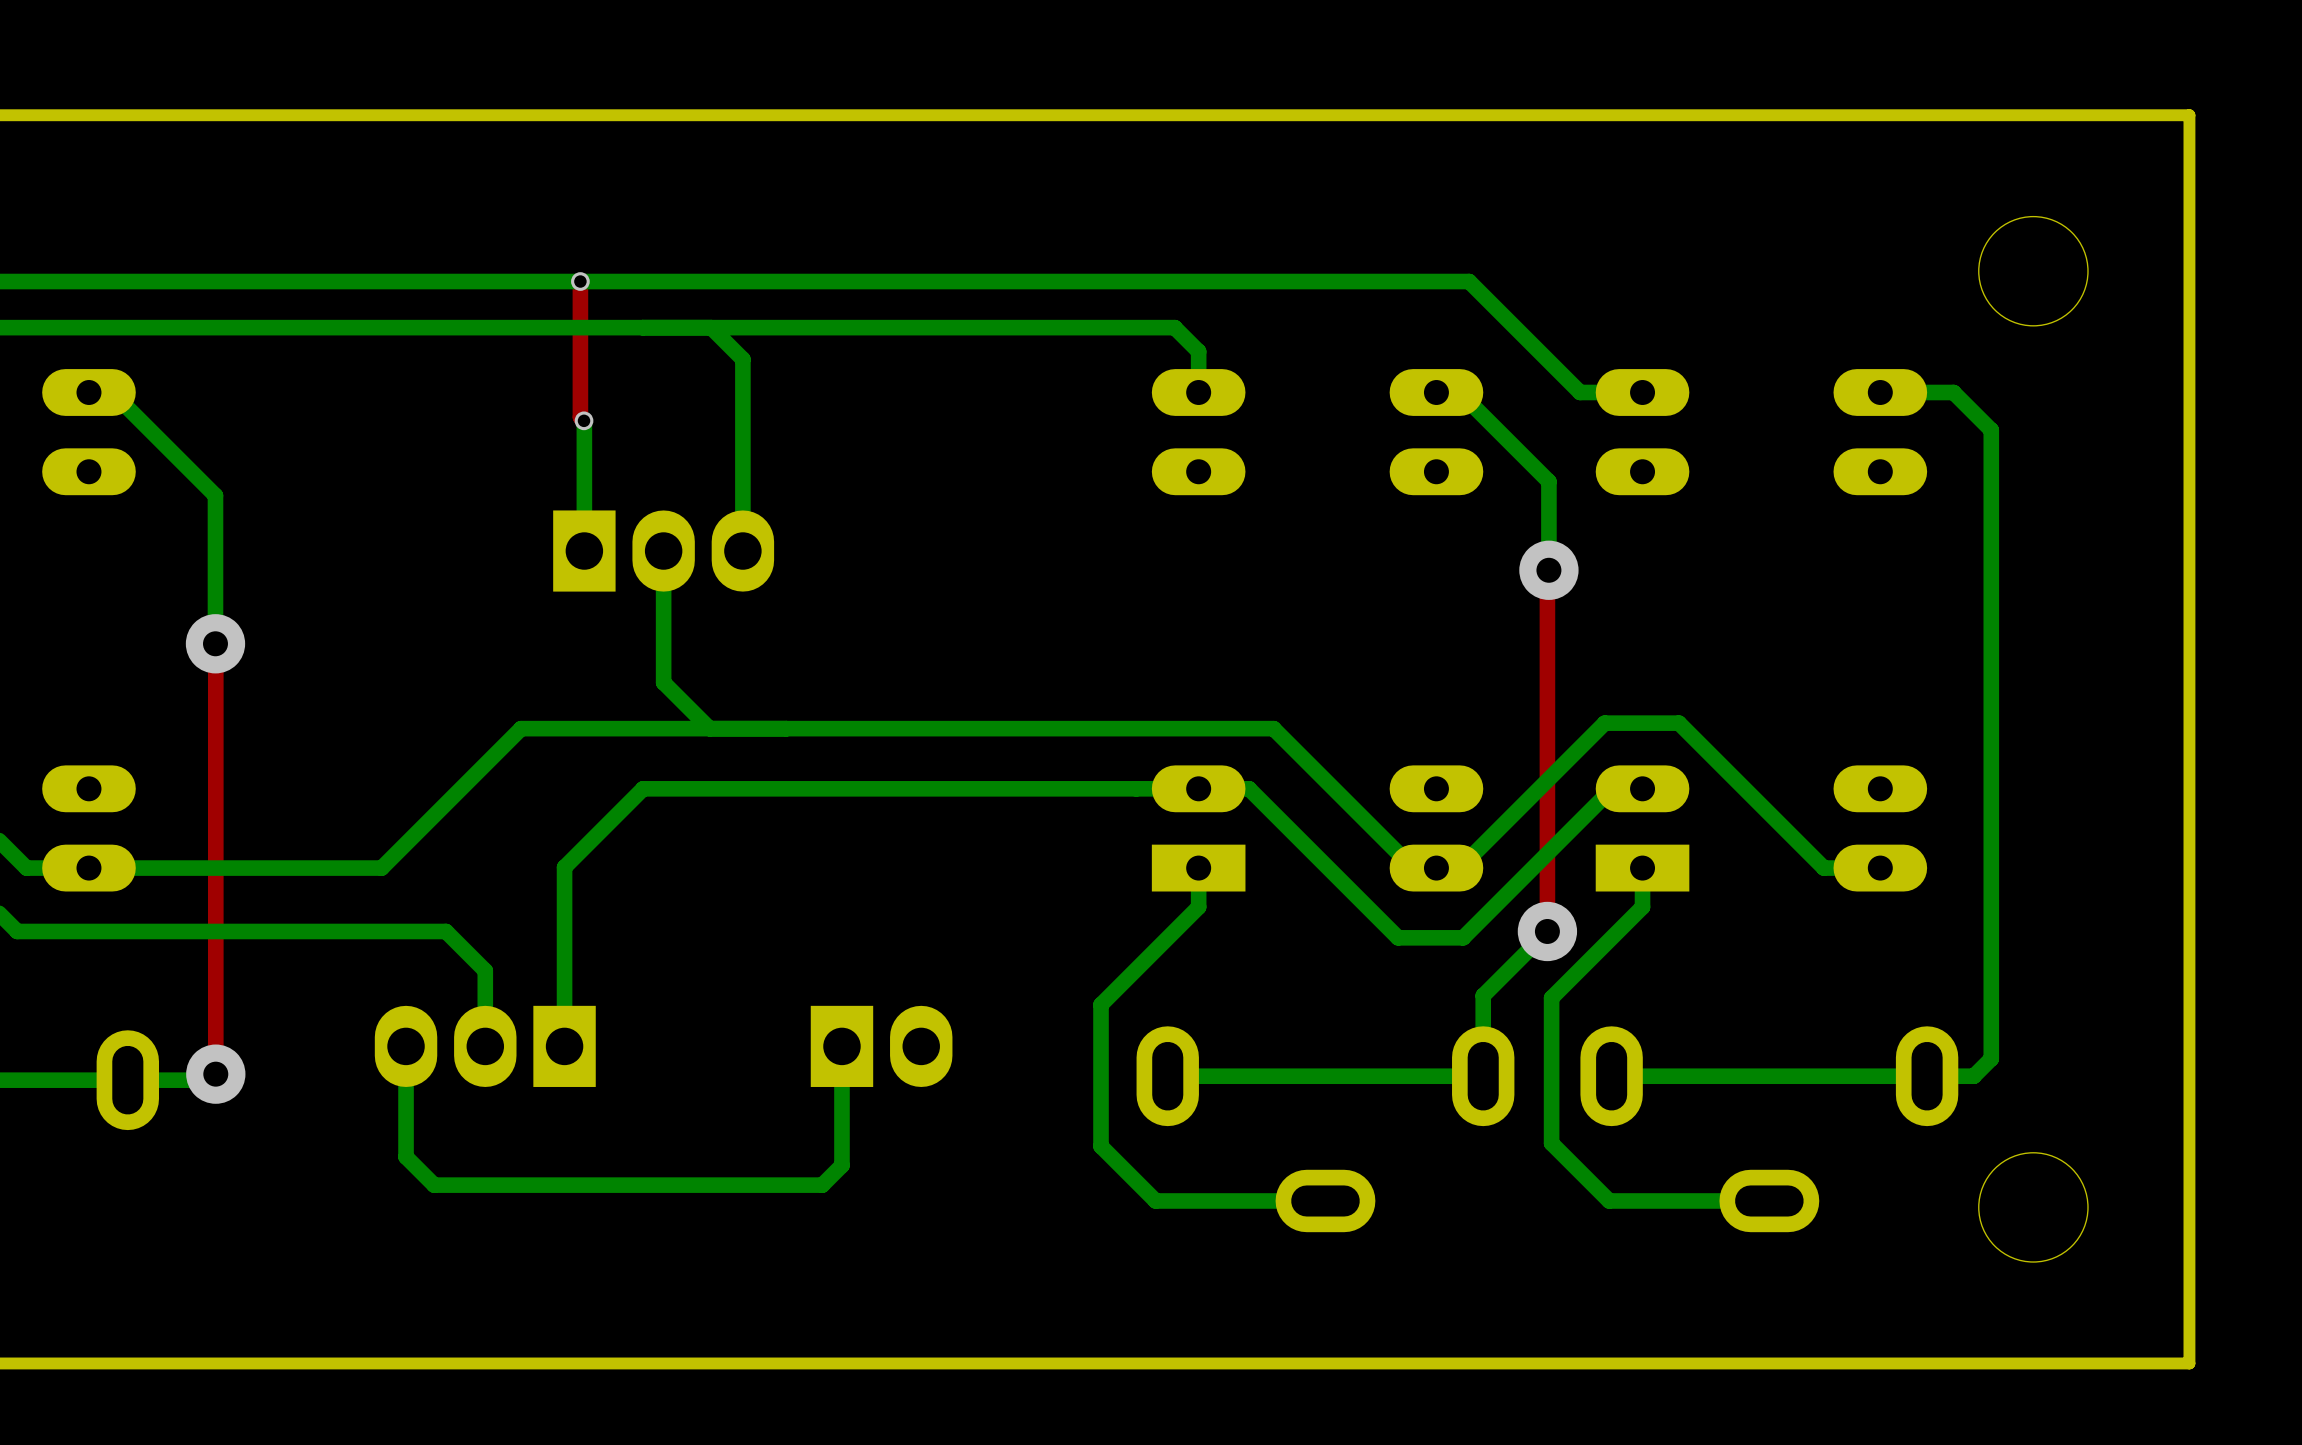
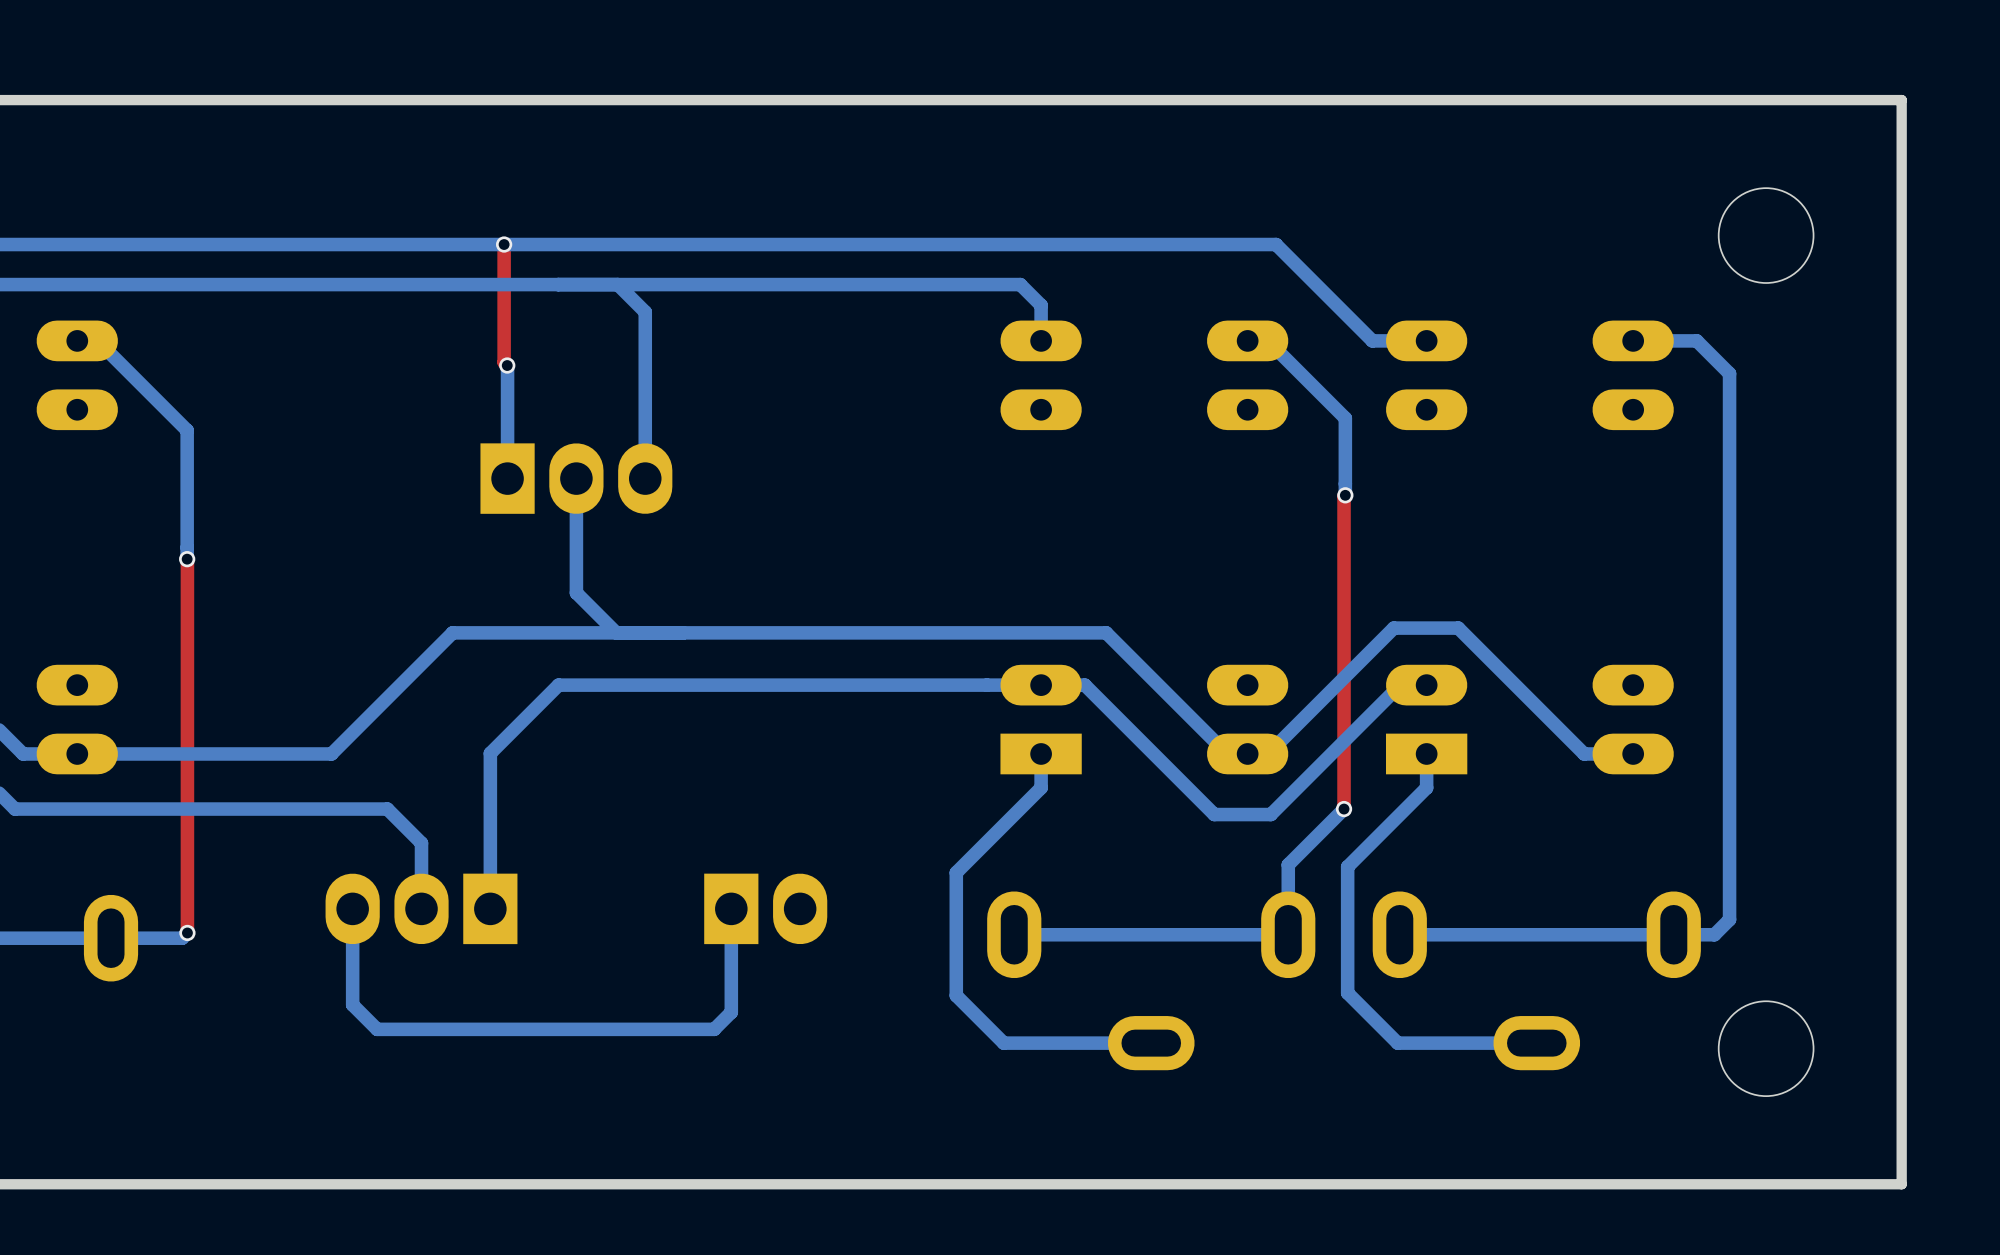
via size: [1519, 540, 1579, 600] -> [1337, 487, 1354, 504]
via size: [185, 614, 246, 674] -> [179, 551, 196, 568]
via size: [1517, 901, 1578, 962] -> [1335, 800, 1353, 818]
via size: [186, 1044, 246, 1104] -> [179, 924, 196, 942]

